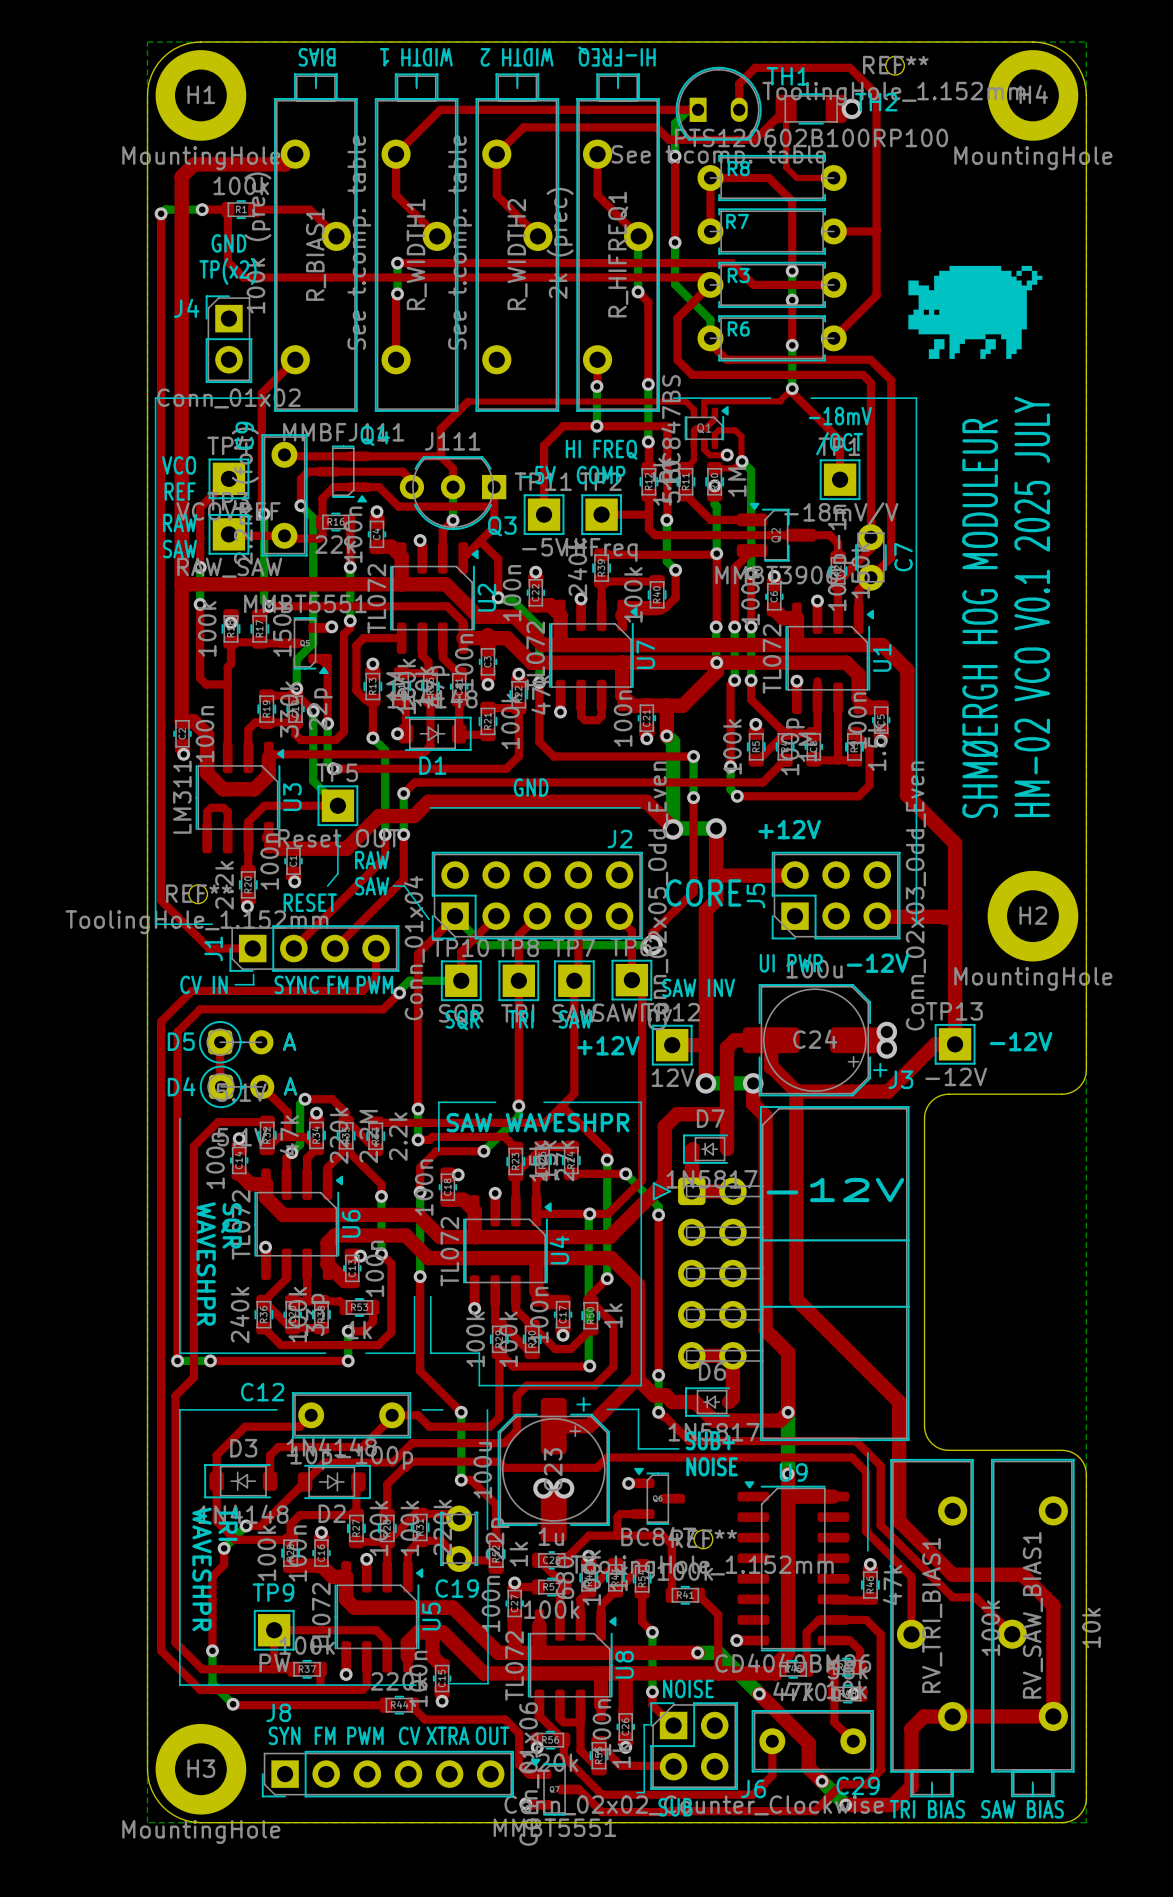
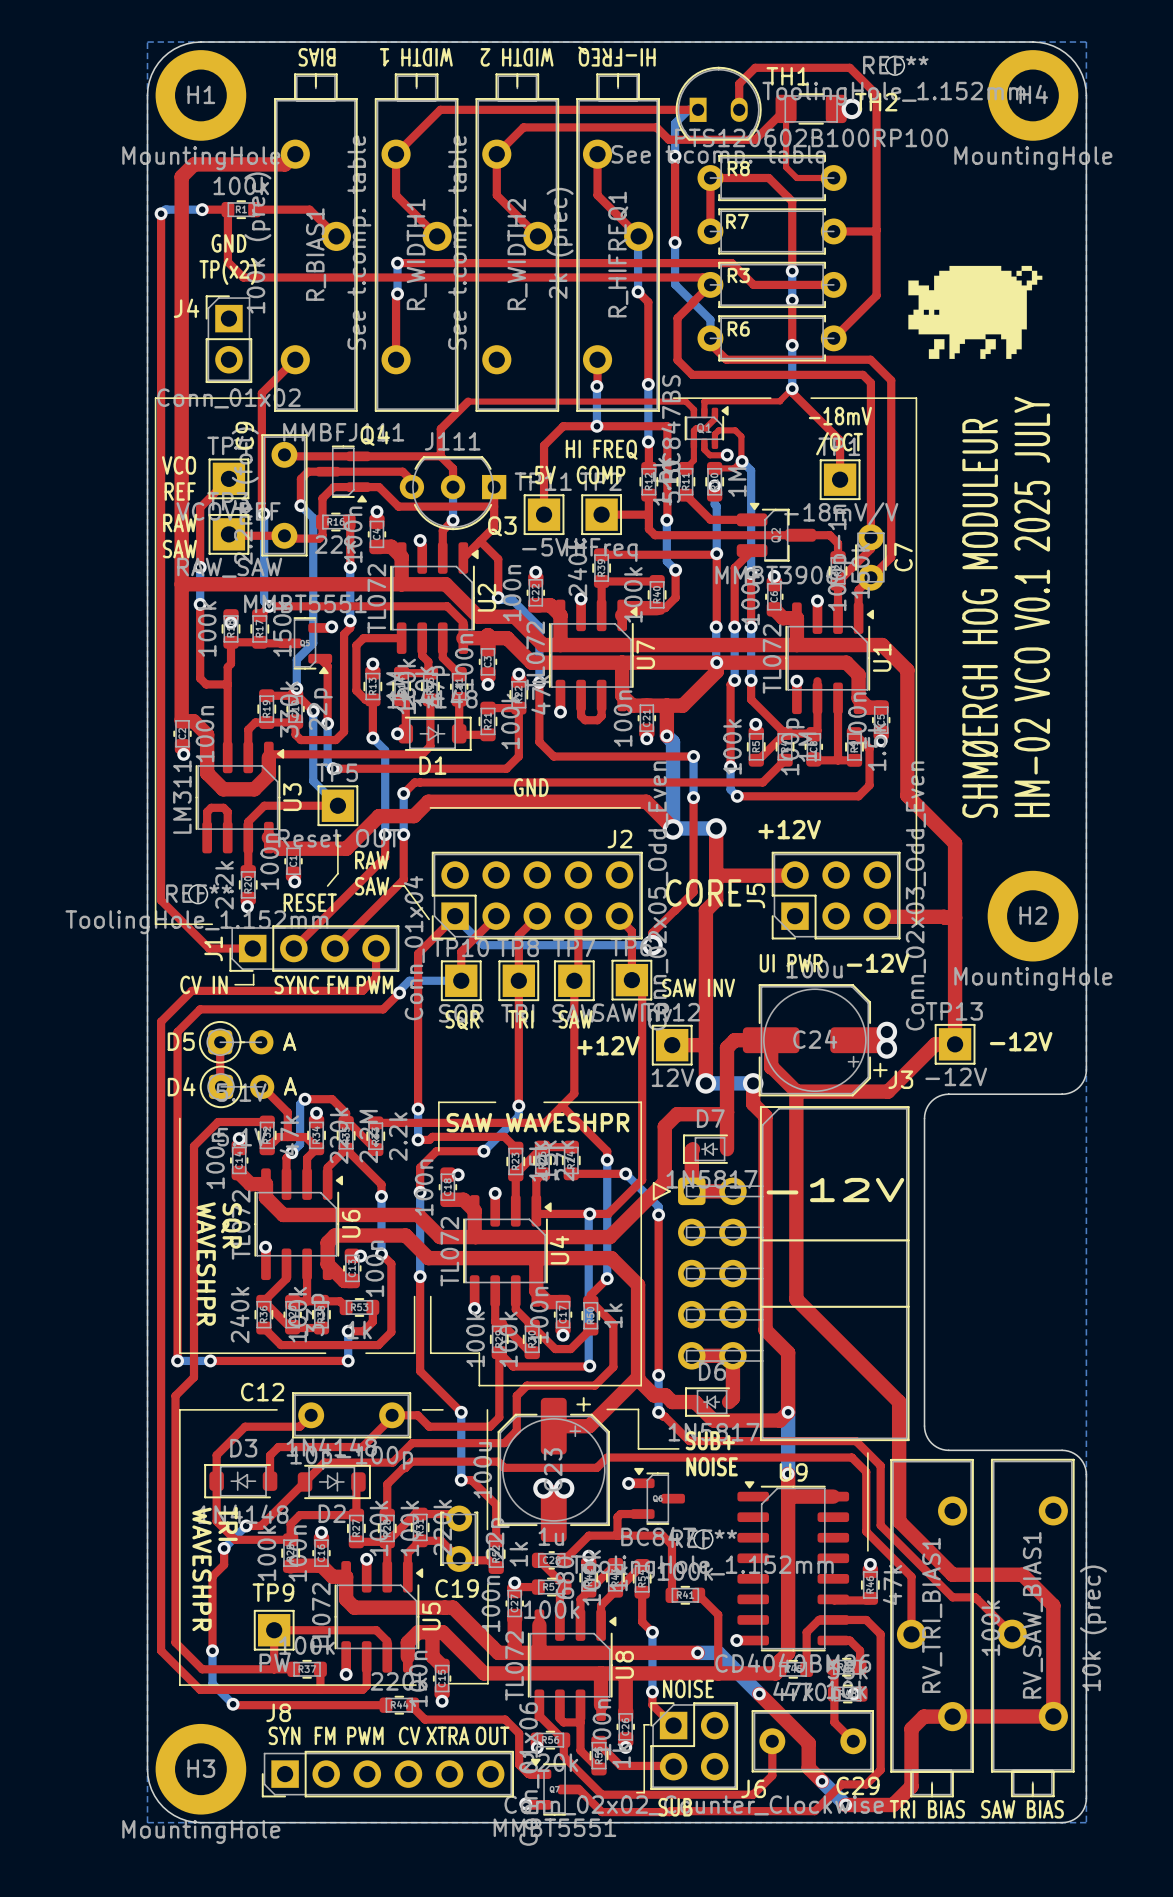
RV_SAW_BIAS1 value: 10k (1091, 1627) -> 10k (prec) (1093, 1628)

